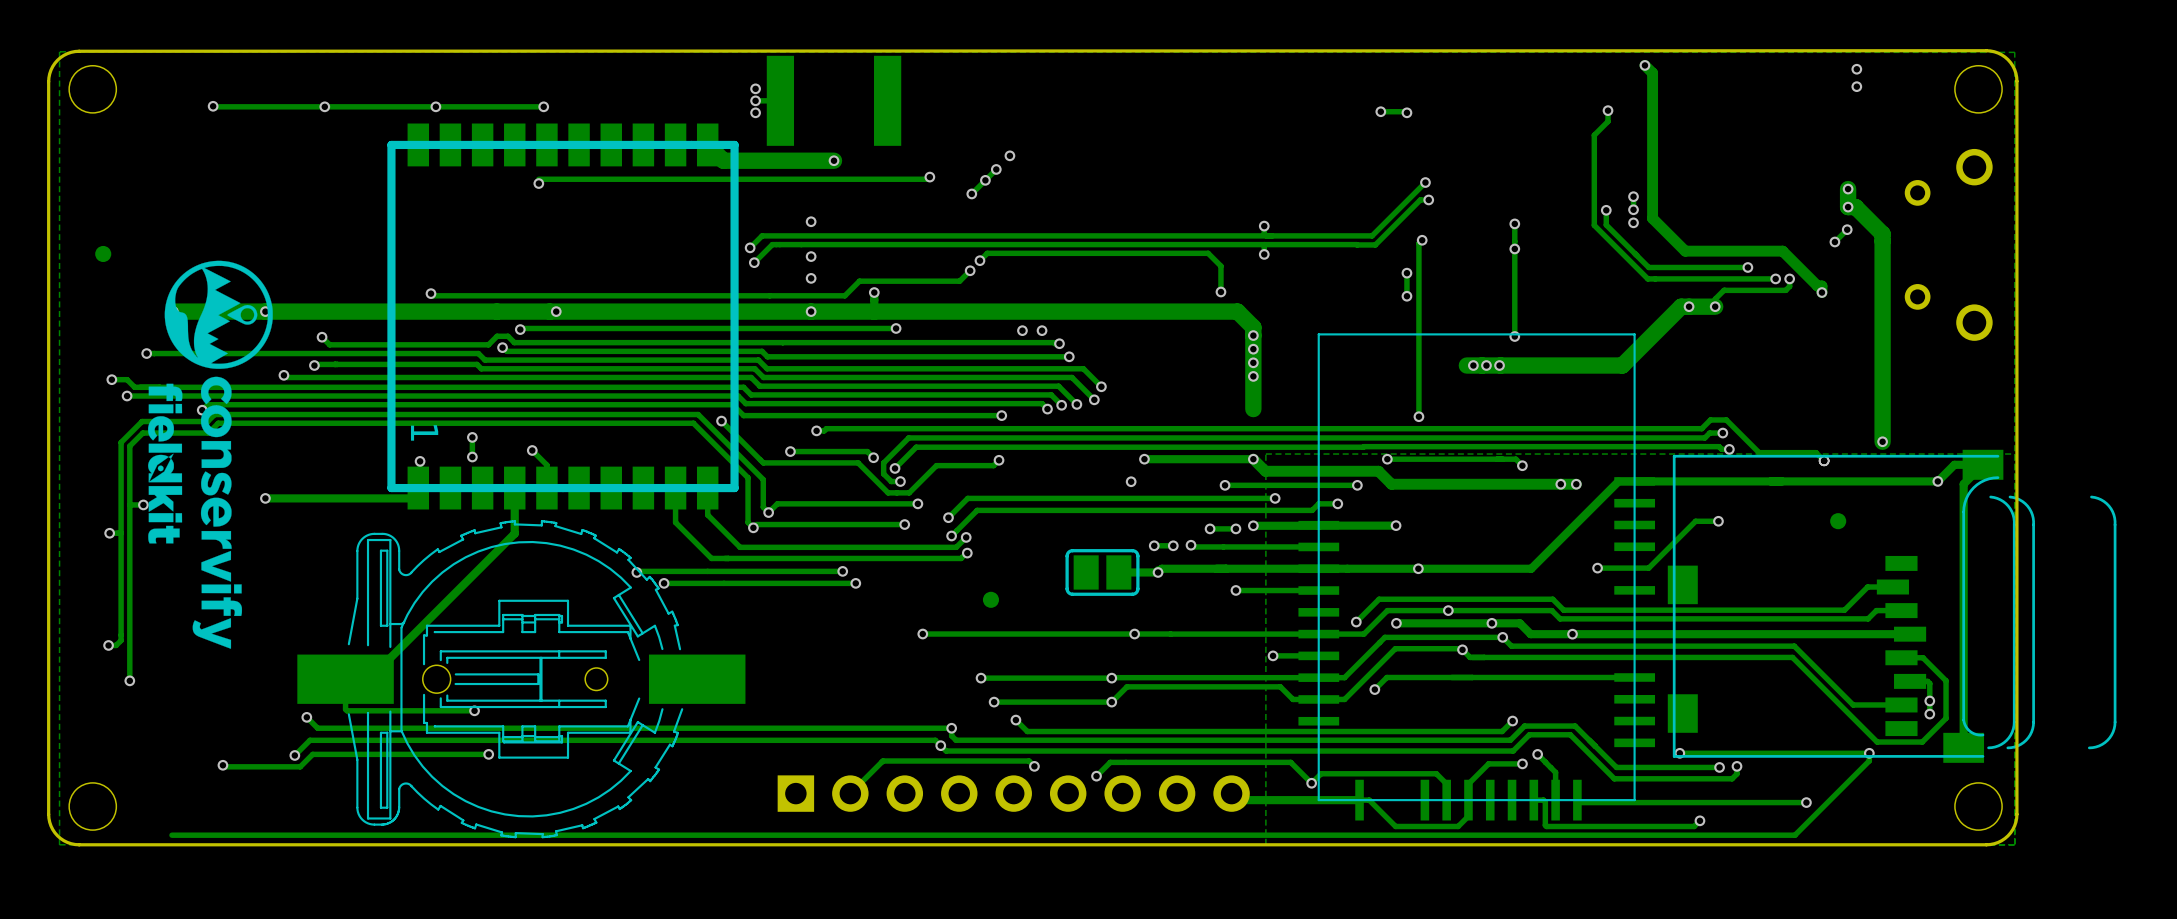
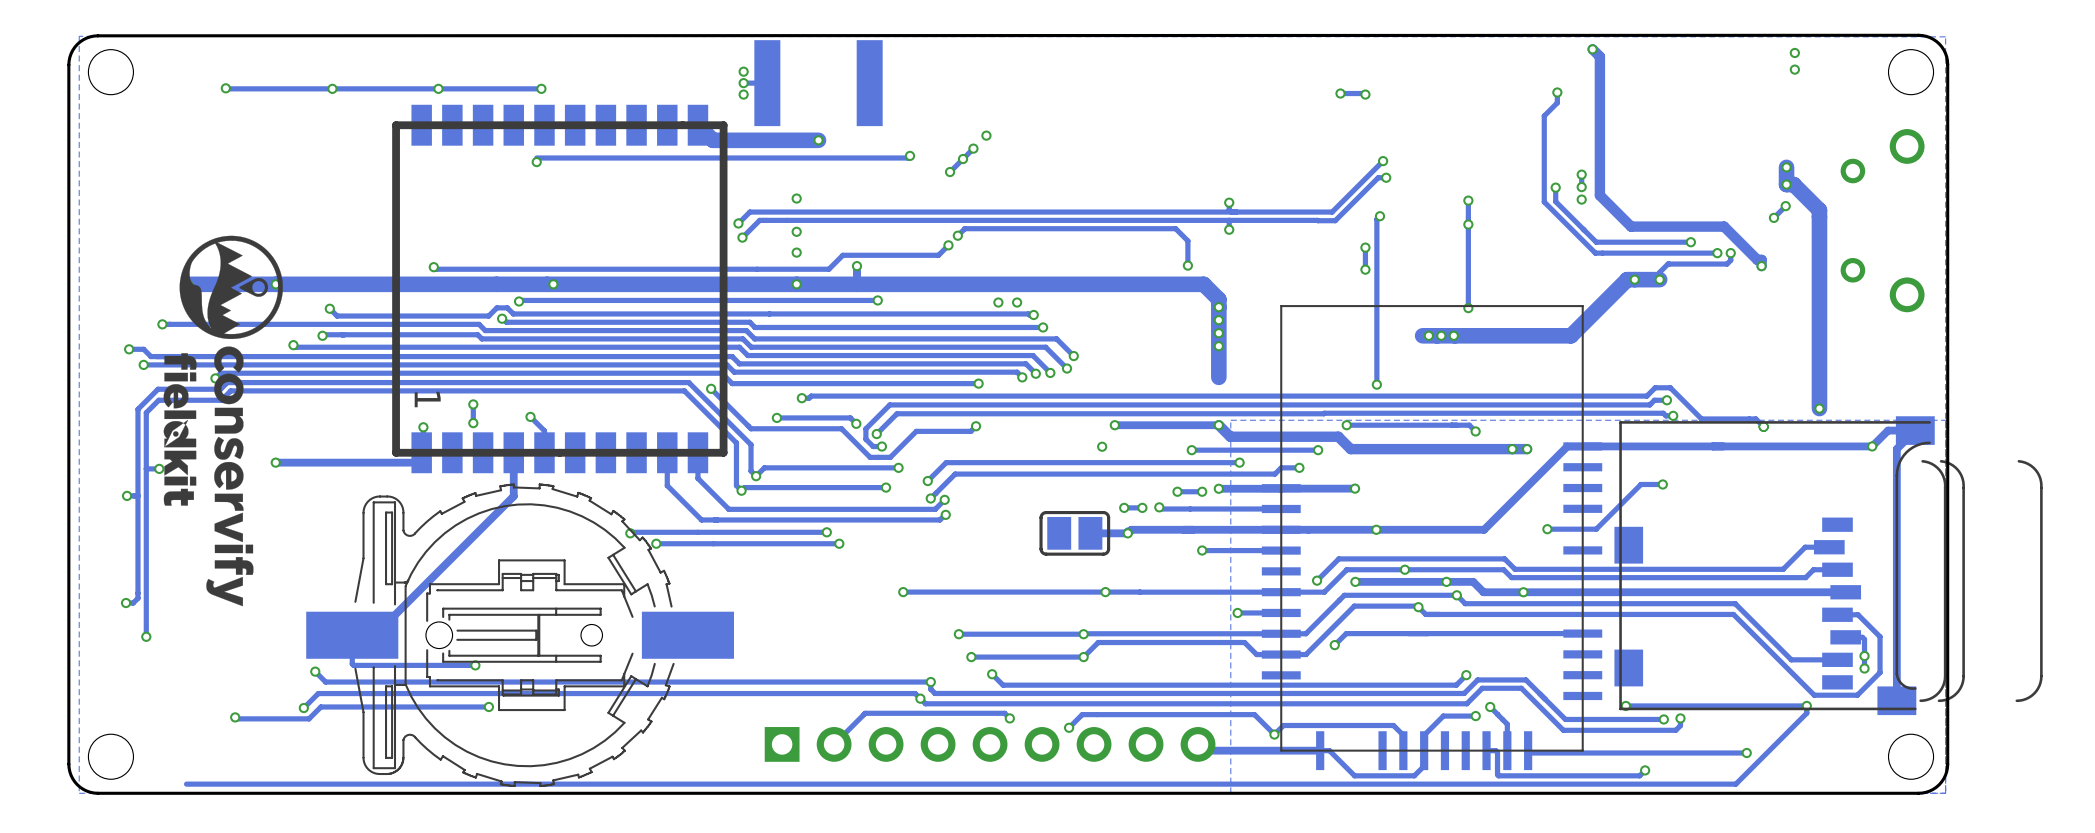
part: (103, 253) -> none
part: (1838, 521) -> none
part: (990, 599) -> none

